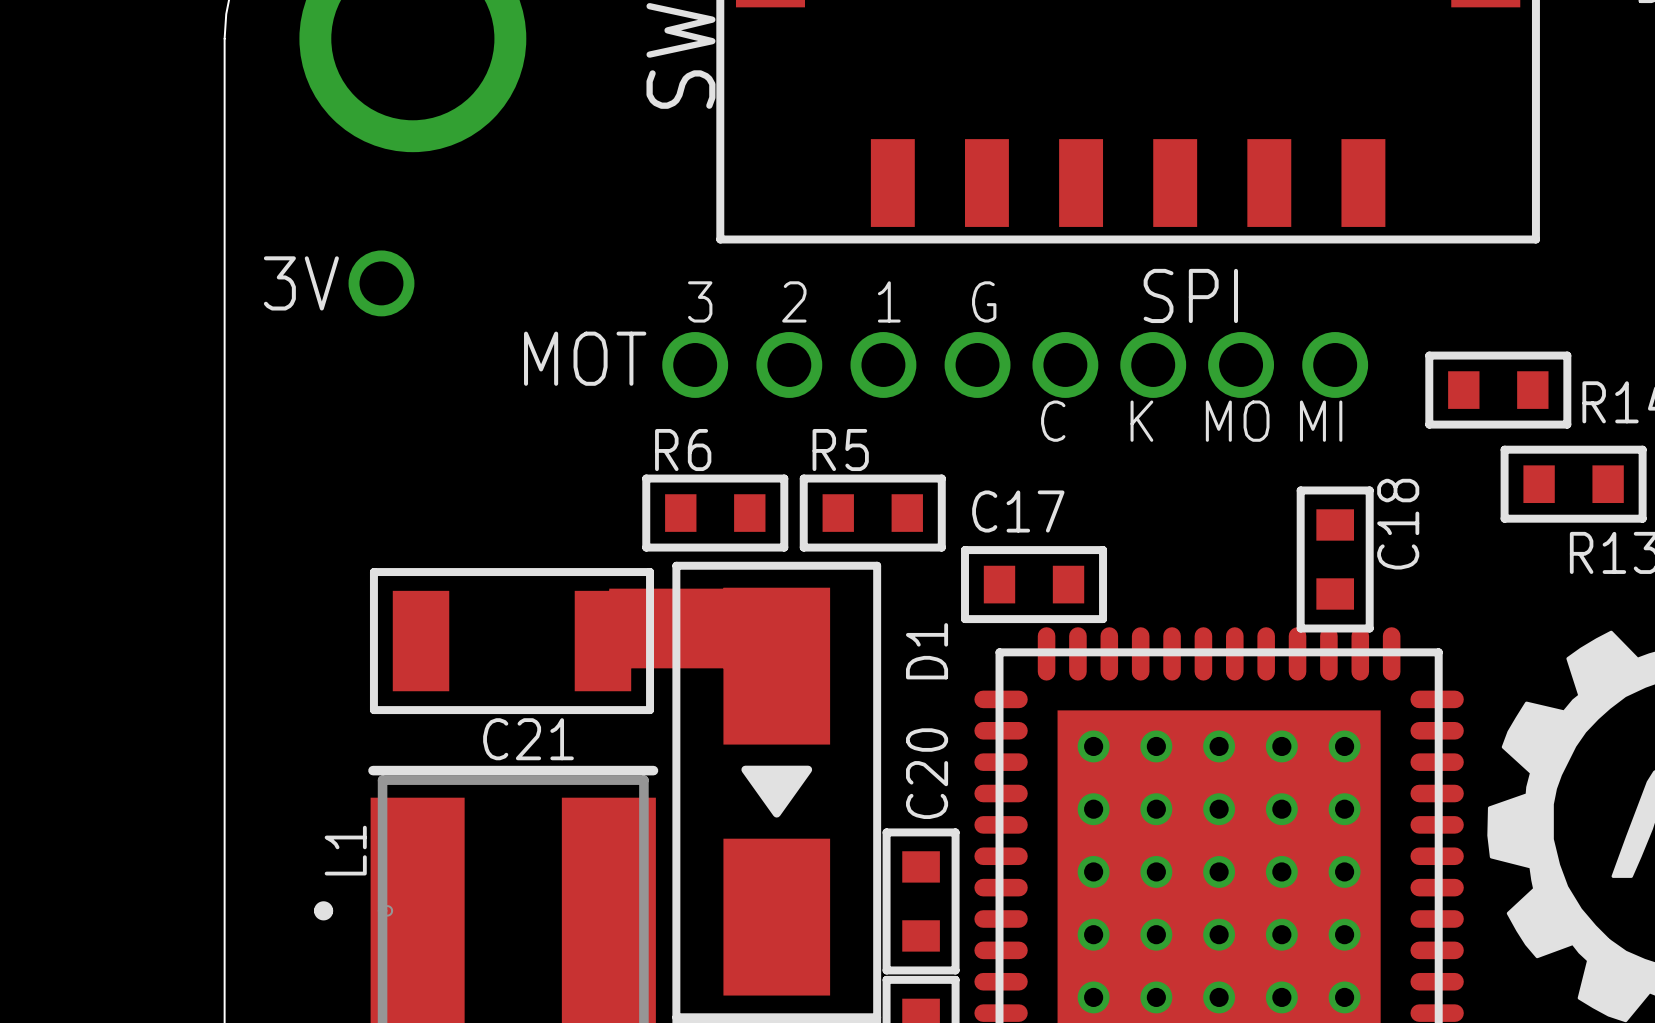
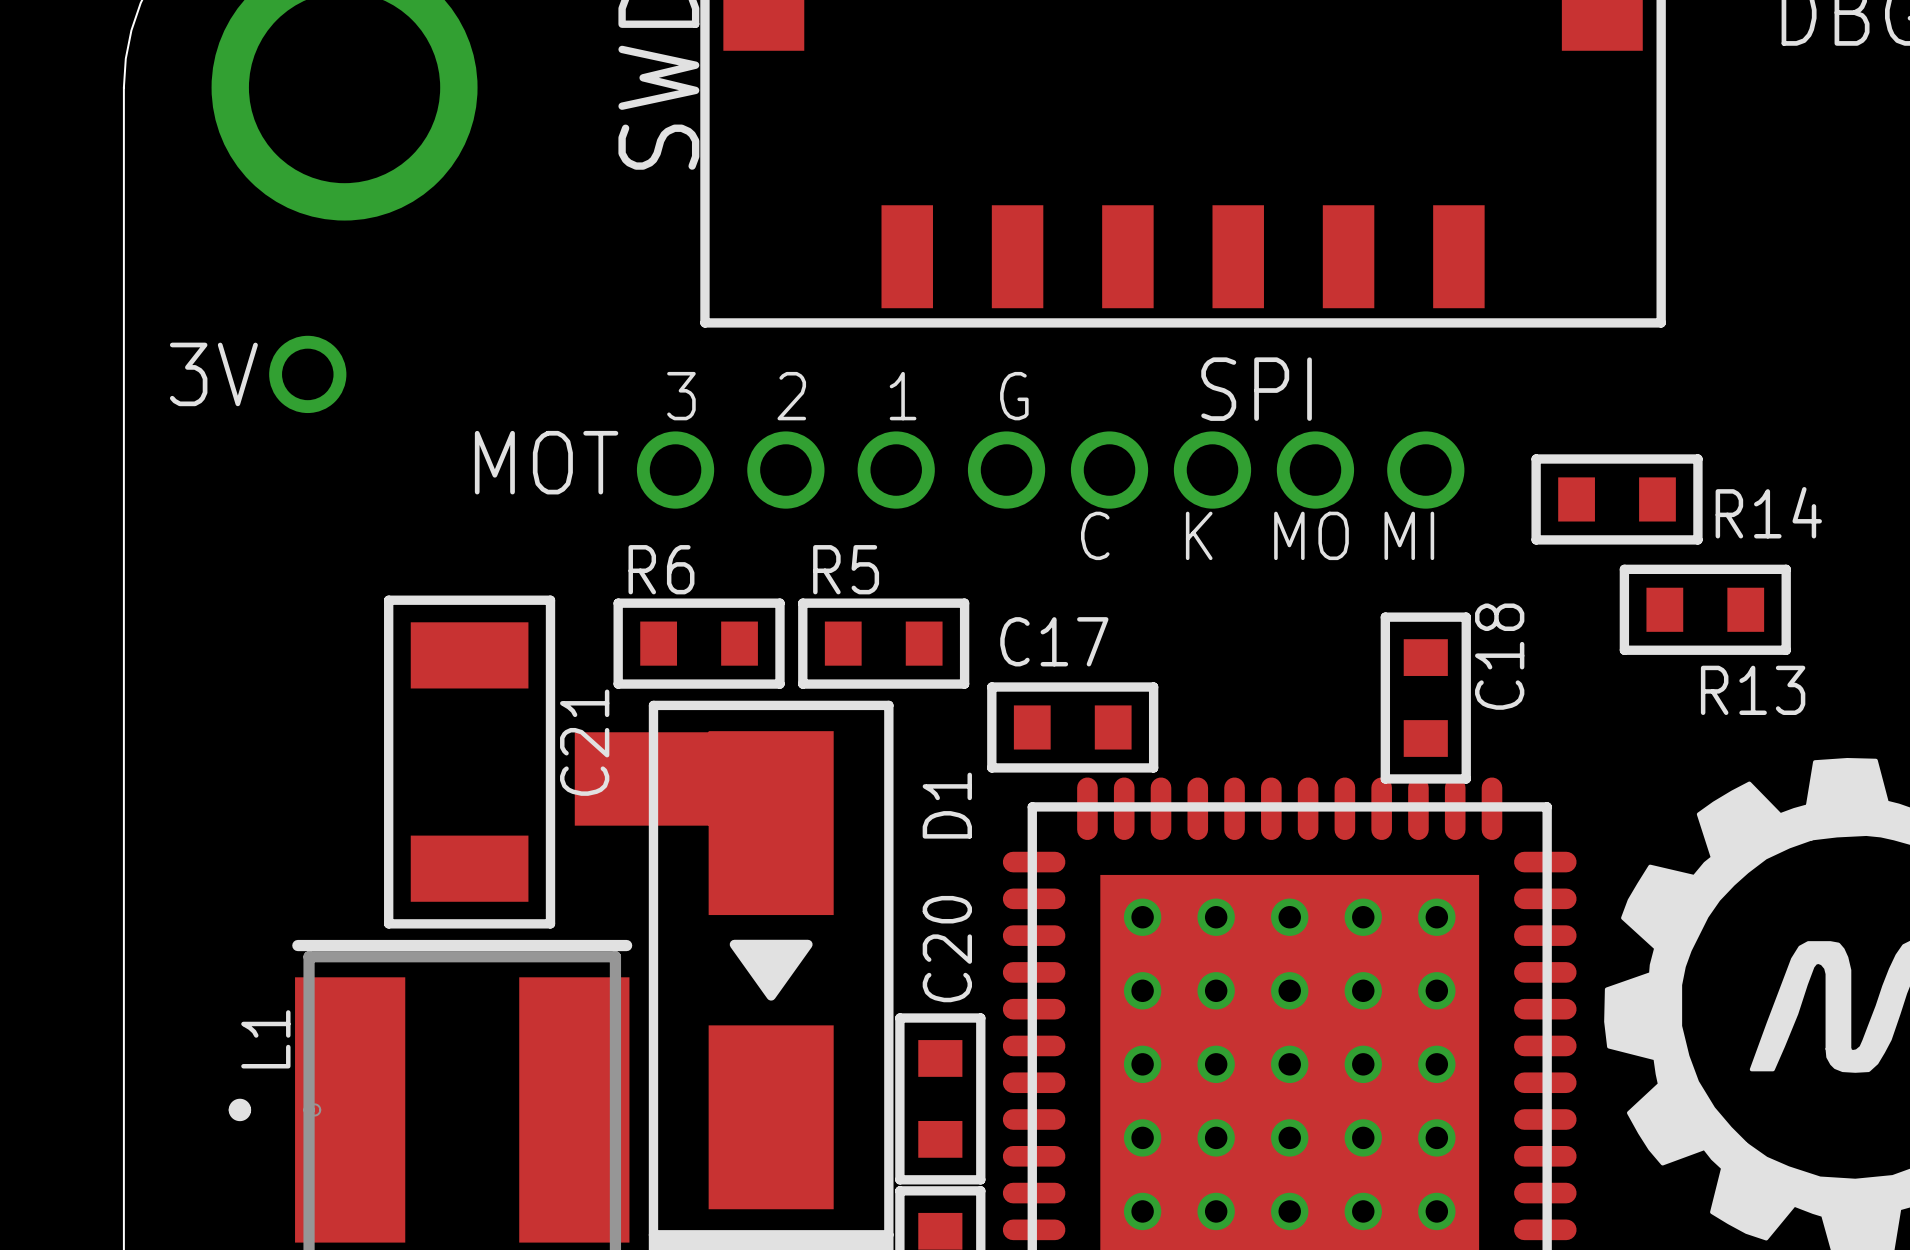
C21 rotation: 0° (511, 641) -> 90° clockwise (469, 762)
C21 name position: C21 (528, 739) -> C21 (584, 742)

